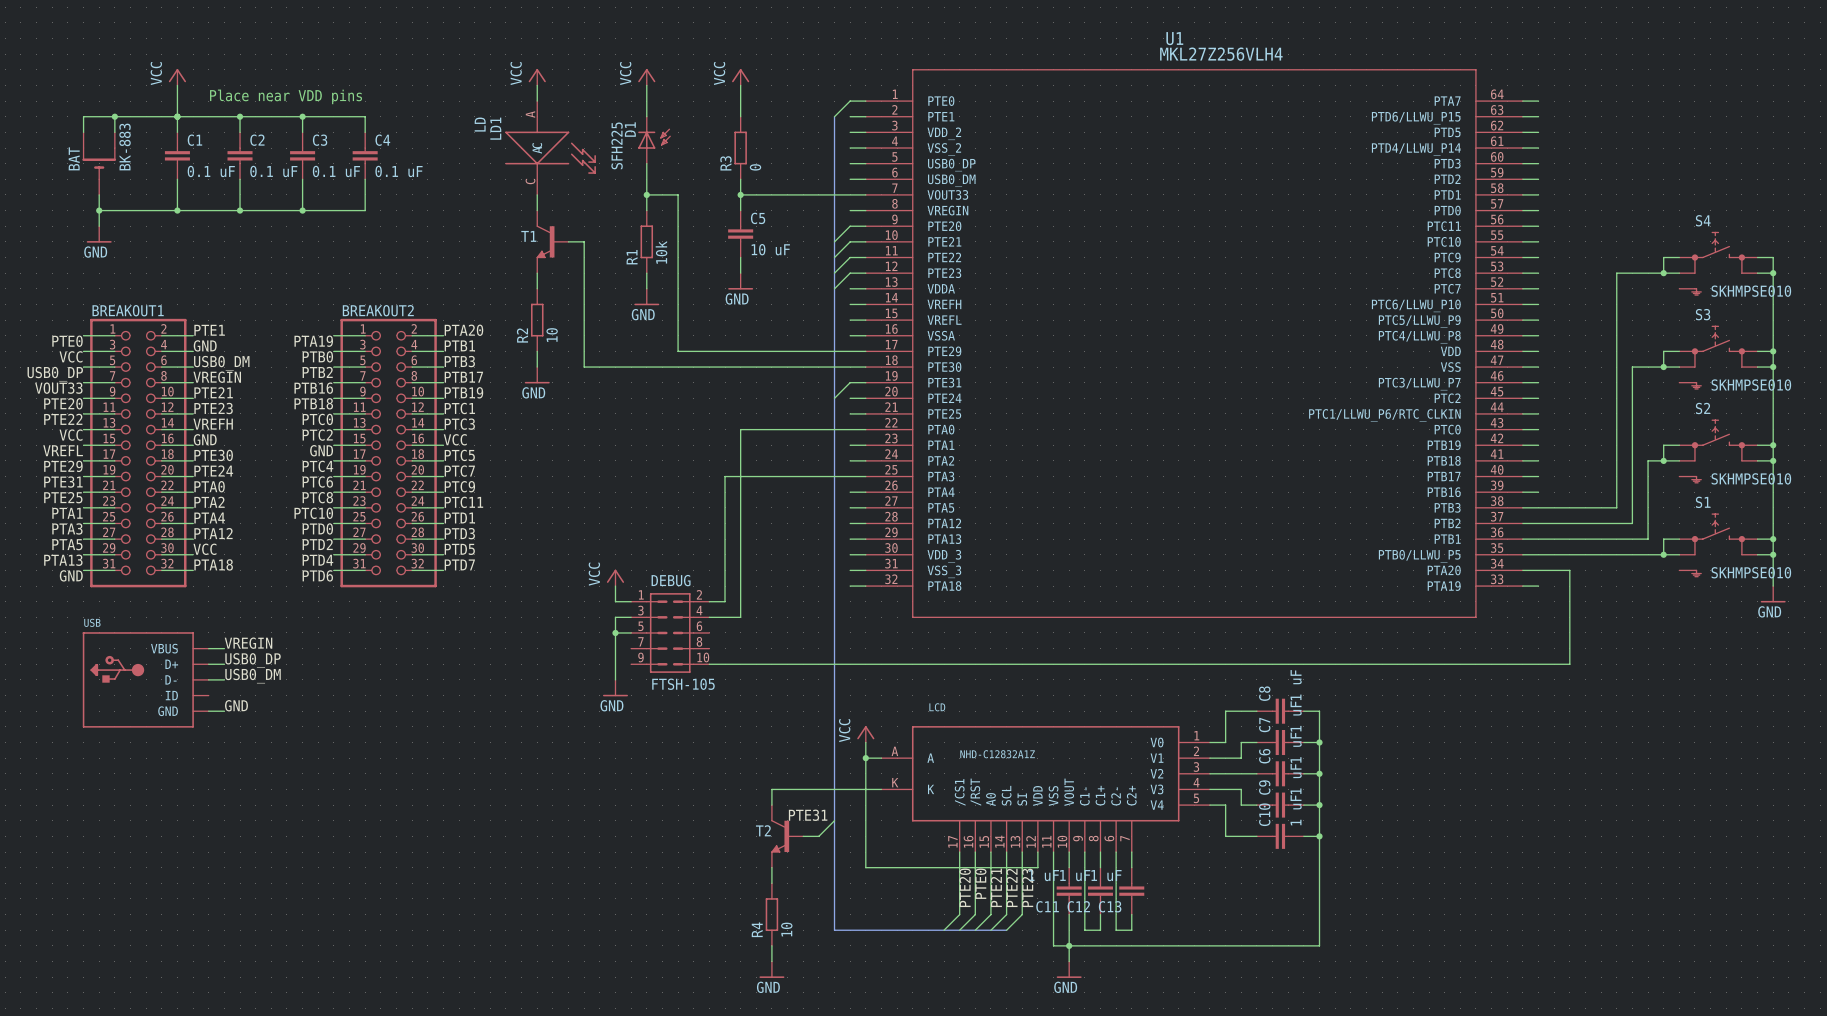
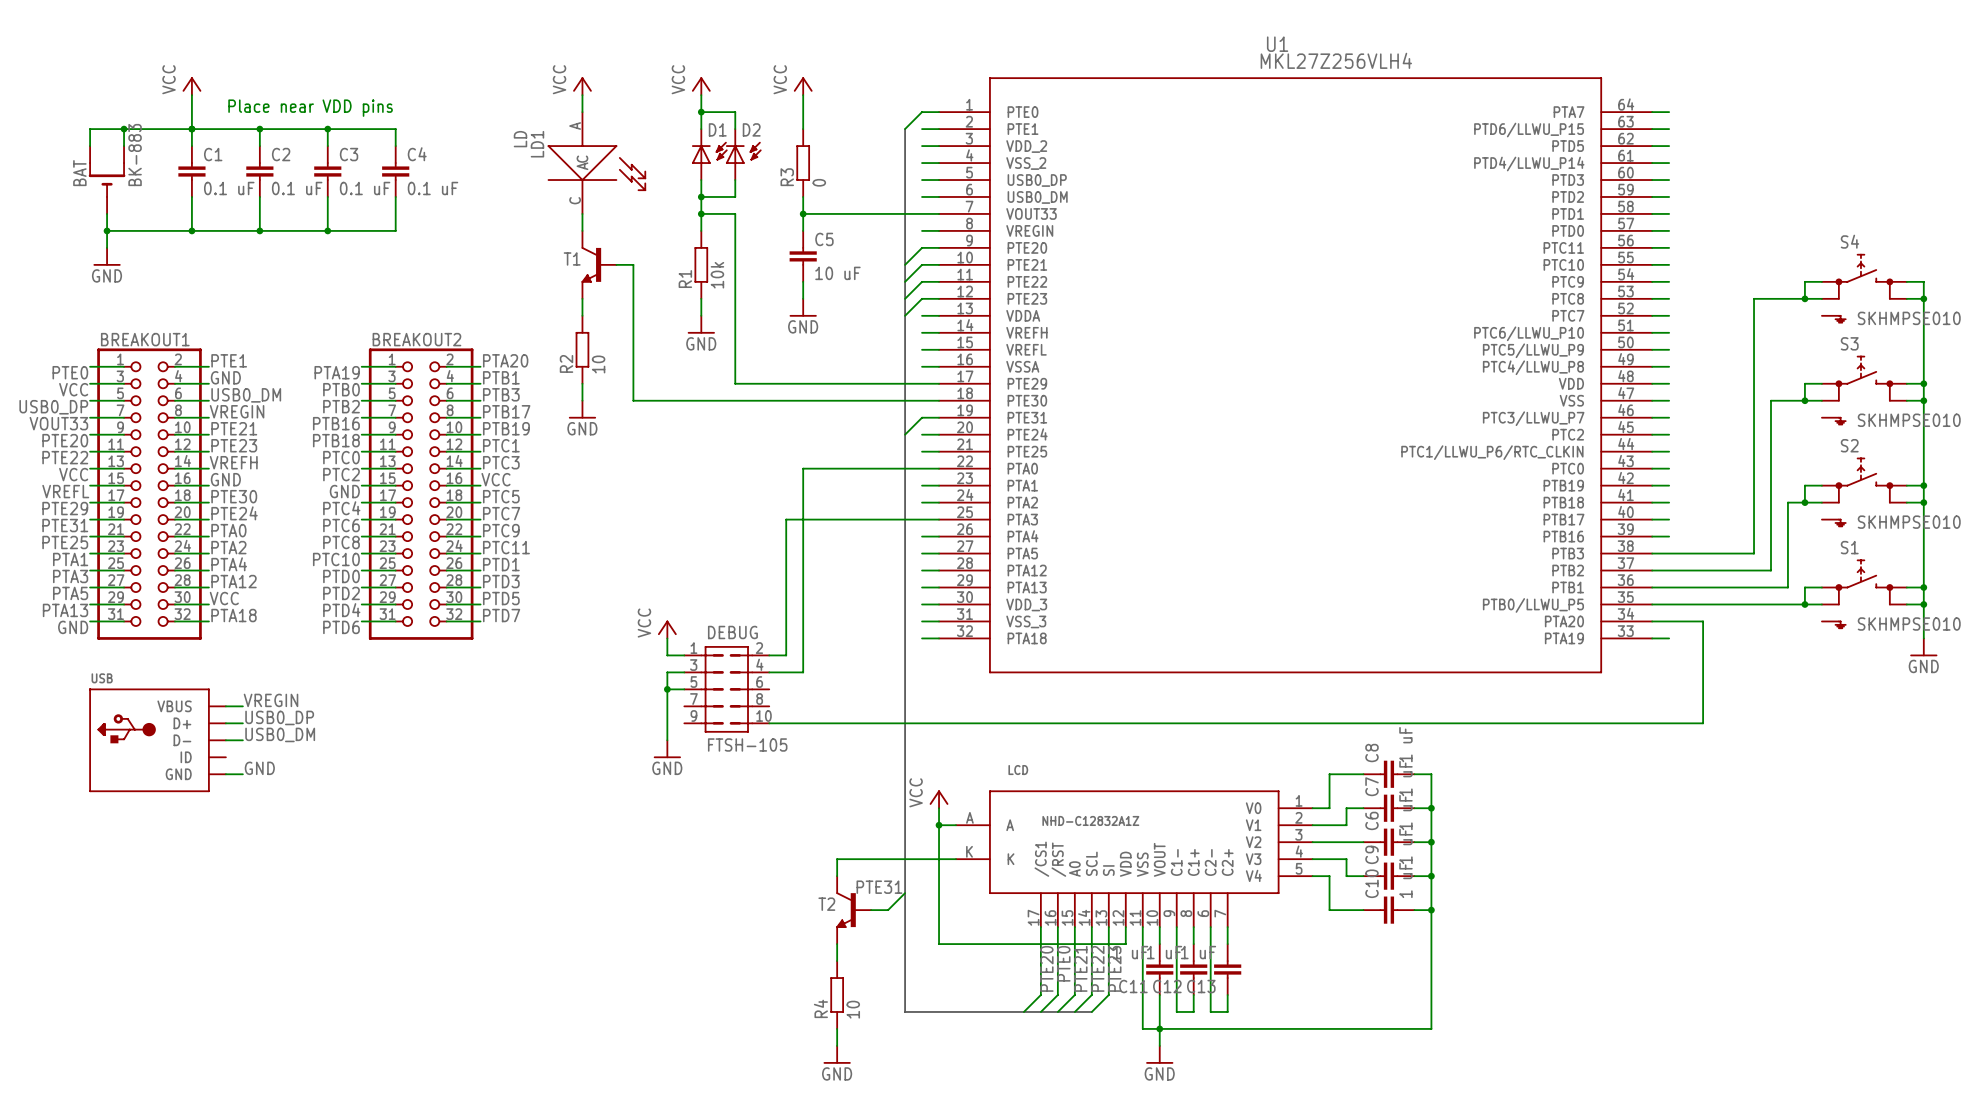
wire: none -> (701, 112) (735, 112) (735, 129)
junction: none -> (701, 112)
D1 name rotation: 0° (630, 129) -> 90° clockwise (717, 129)
D1 name position: D1 (630, 129) -> D1 (717, 129)
D2: none -> (743, 154)
D1 value: SFH225 (617, 145) -> none
wire: none -> (735, 180) (735, 196) (701, 196)
junction: none -> (701, 196)

